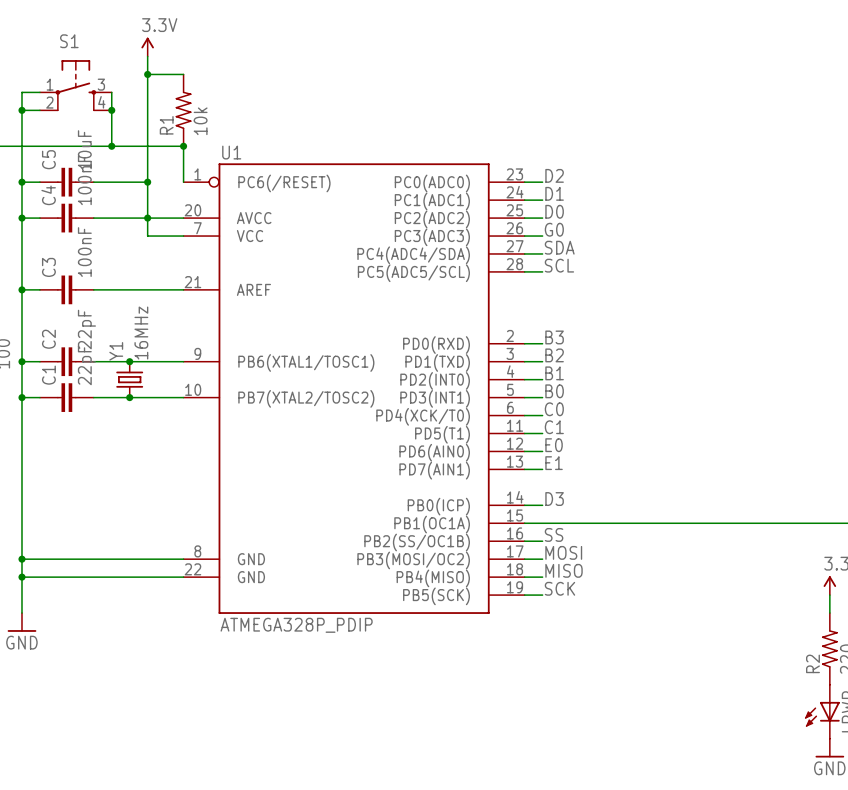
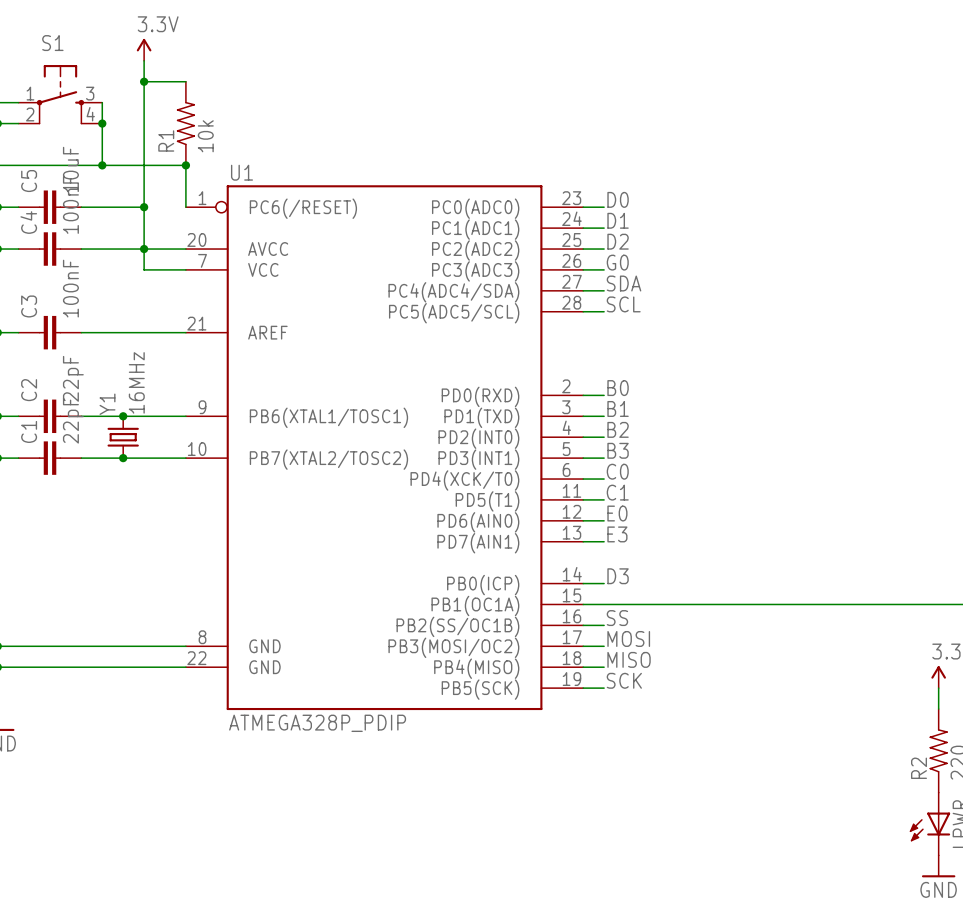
label: D2 (554, 175) -> D0 (618, 199)
label: D0 (554, 211) -> D2 (618, 241)
label: B3 (554, 337) -> B0 (618, 388)
label: B2 (554, 355) -> B1 (618, 408)
label: B1 (554, 373) -> B2 (618, 429)
label: B0 (554, 391) -> B3 (618, 450)
label: E1 (554, 463) -> E3 (617, 534)

